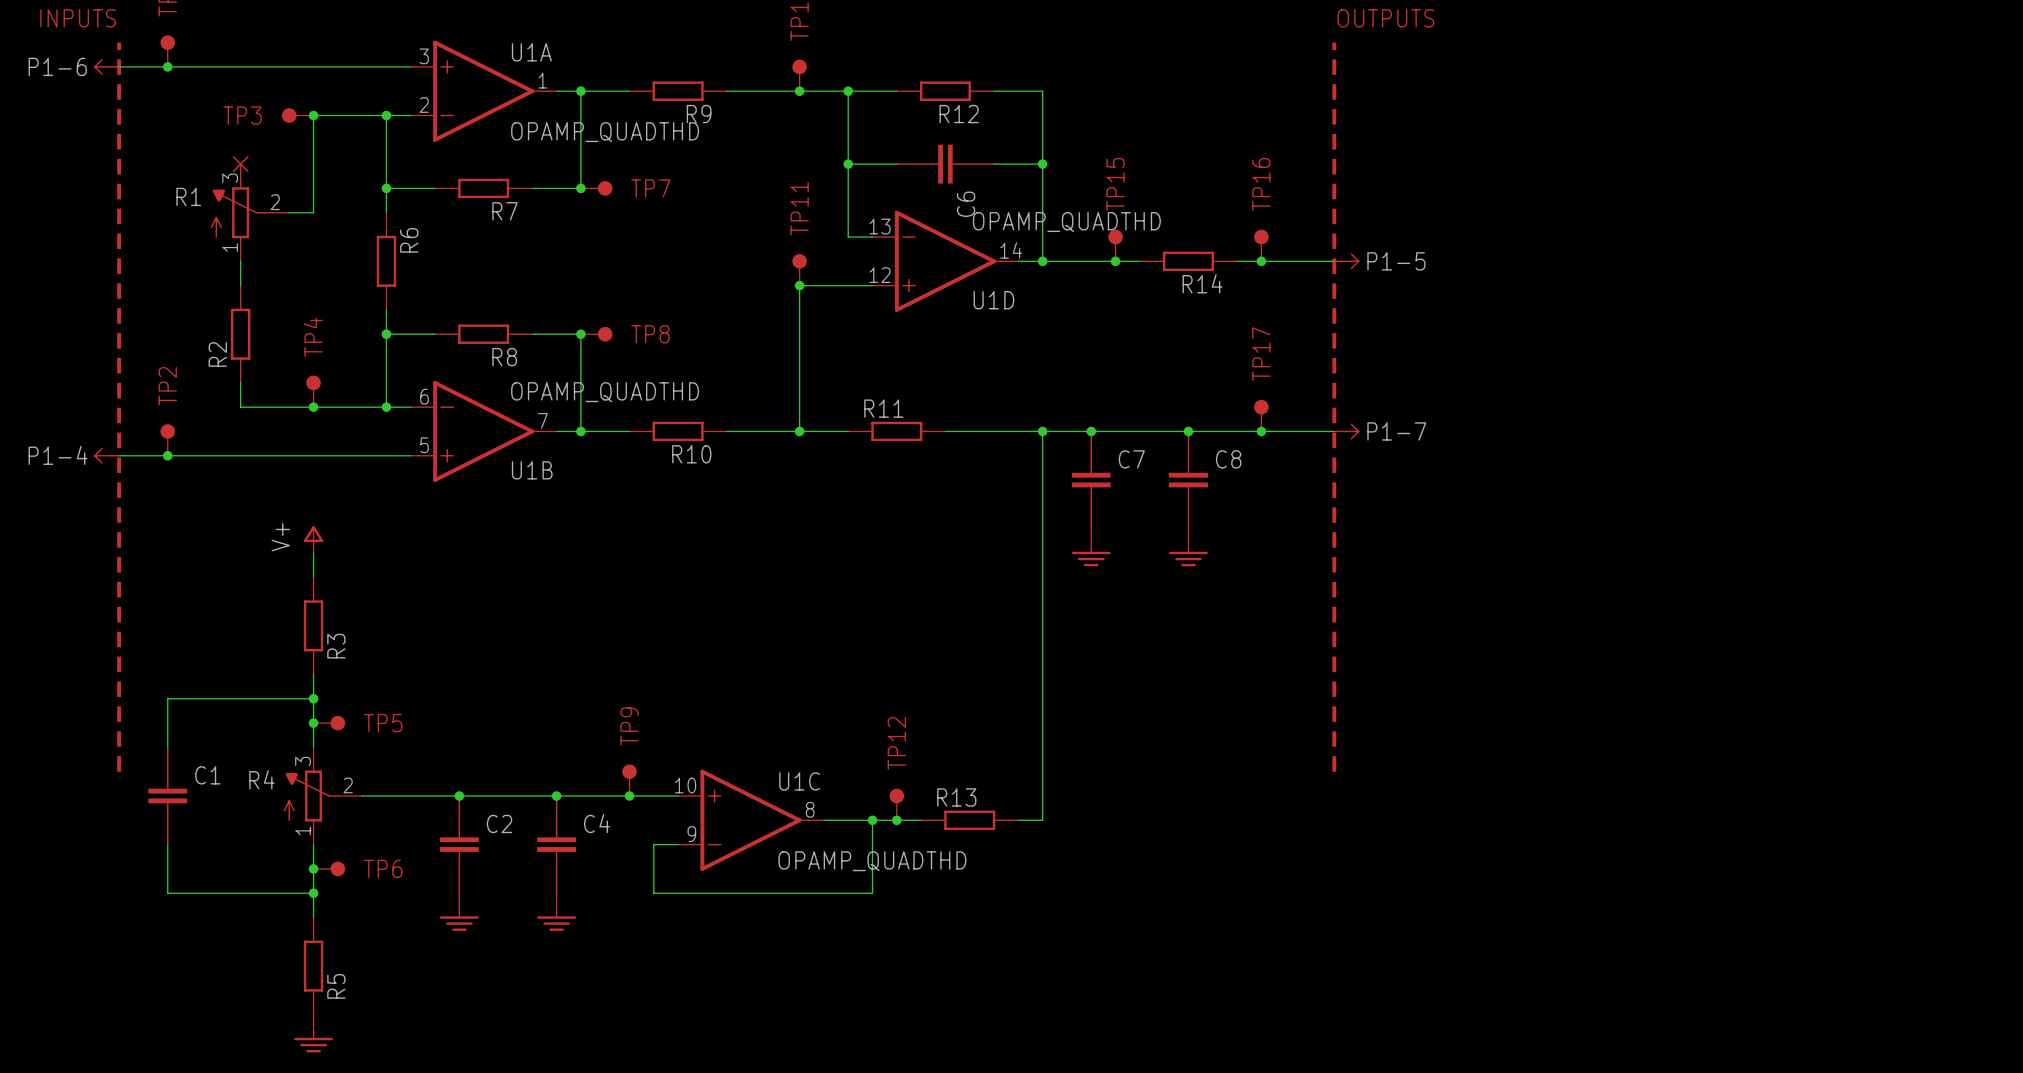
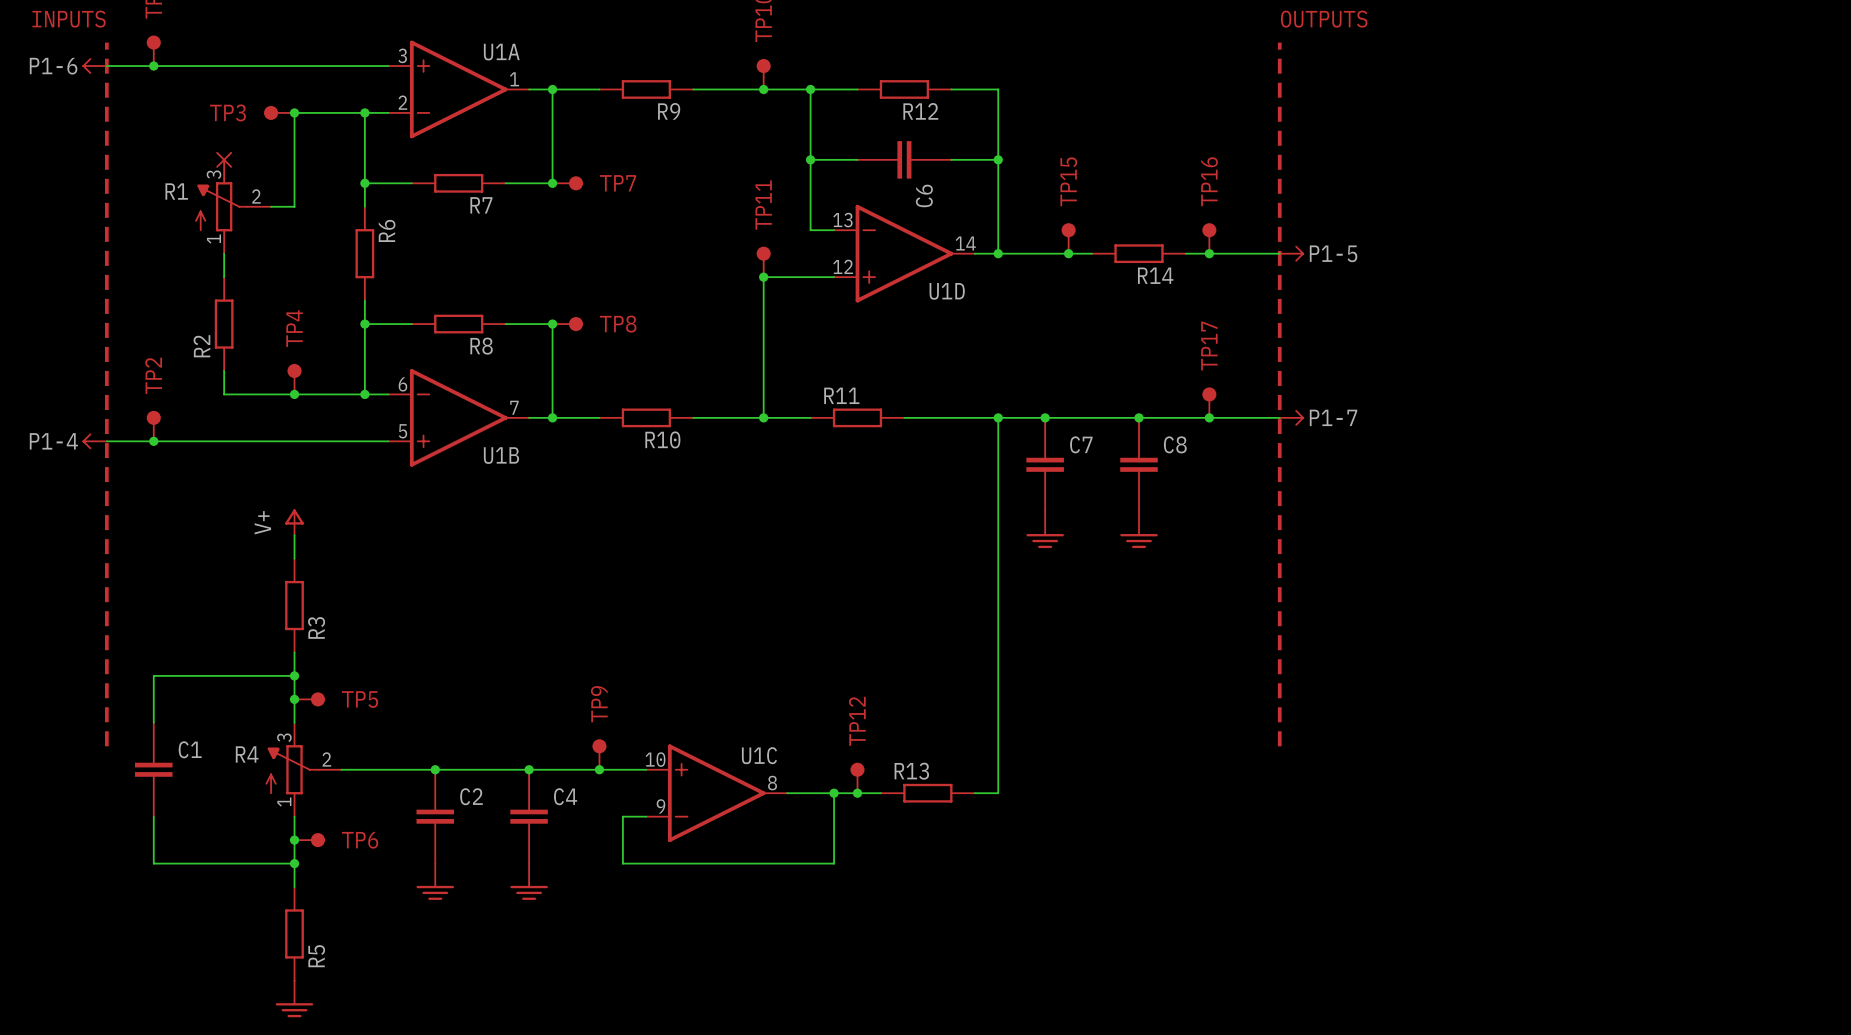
U1A value: OPAMP_QUADTHD (605, 132) -> none
U1D value: OPAMP_QUADTHD (1066, 222) -> none
U1B value: OPAMP_QUADTHD (605, 392) -> none
U1C value: OPAMP_QUADTHD (872, 861) -> none

